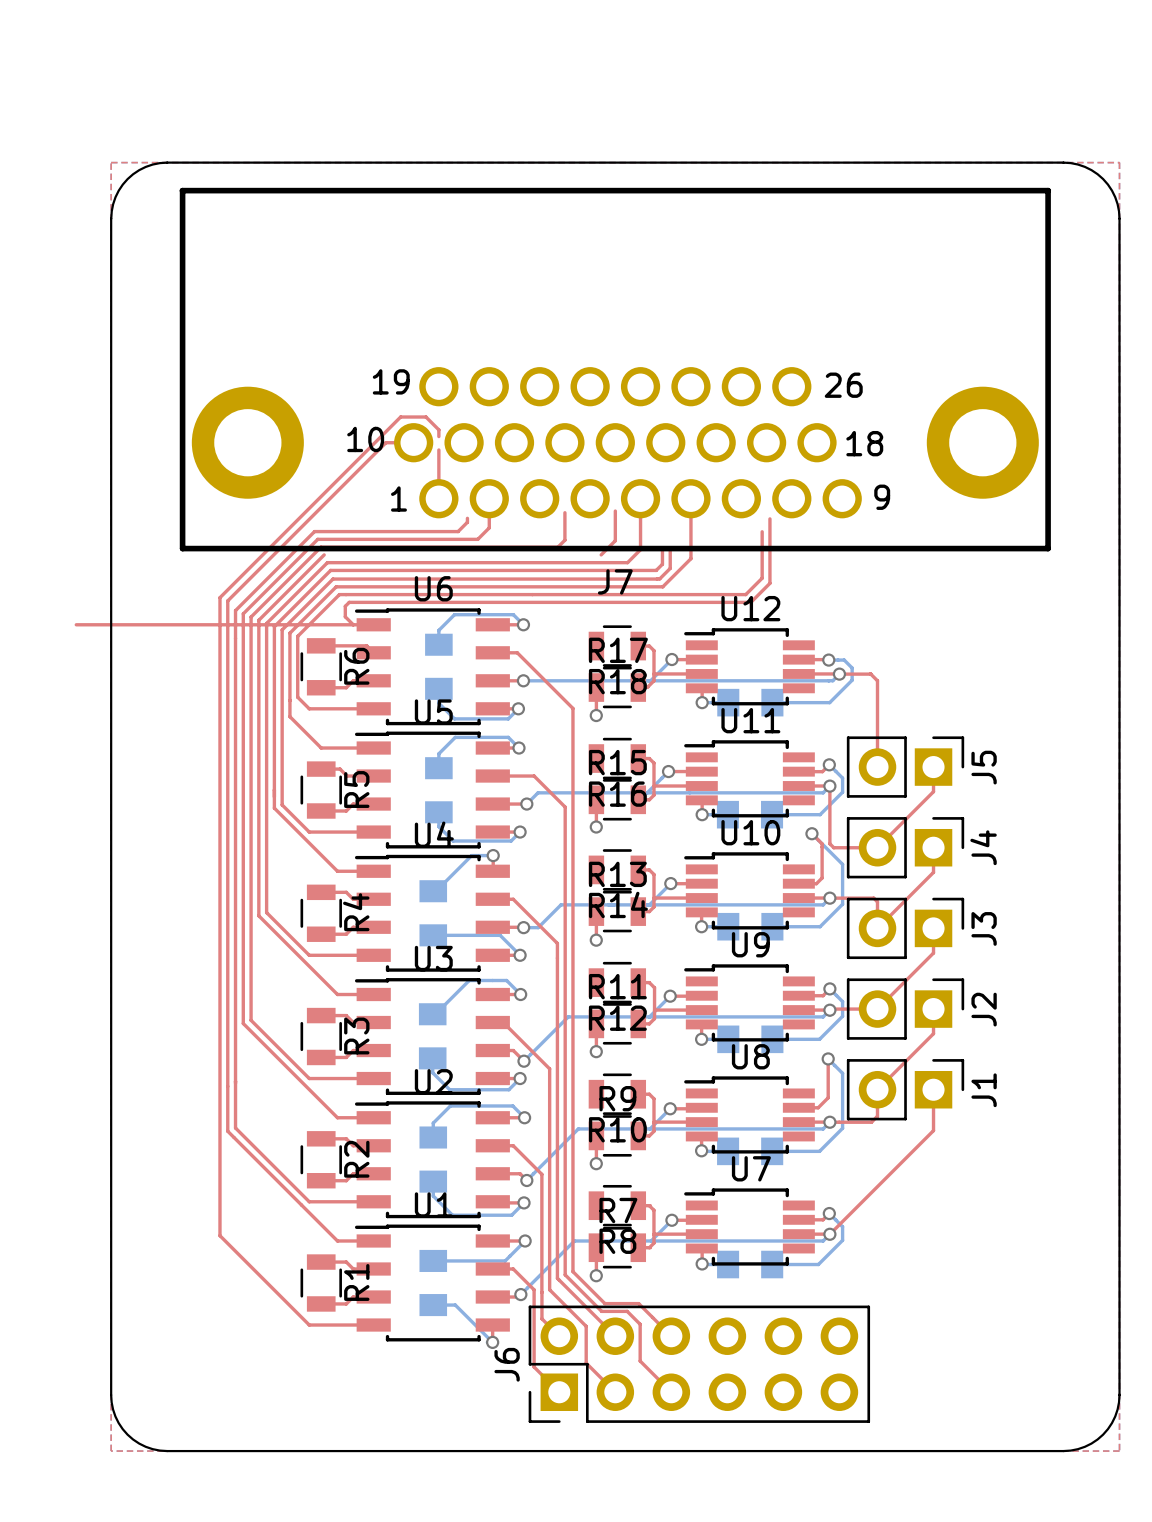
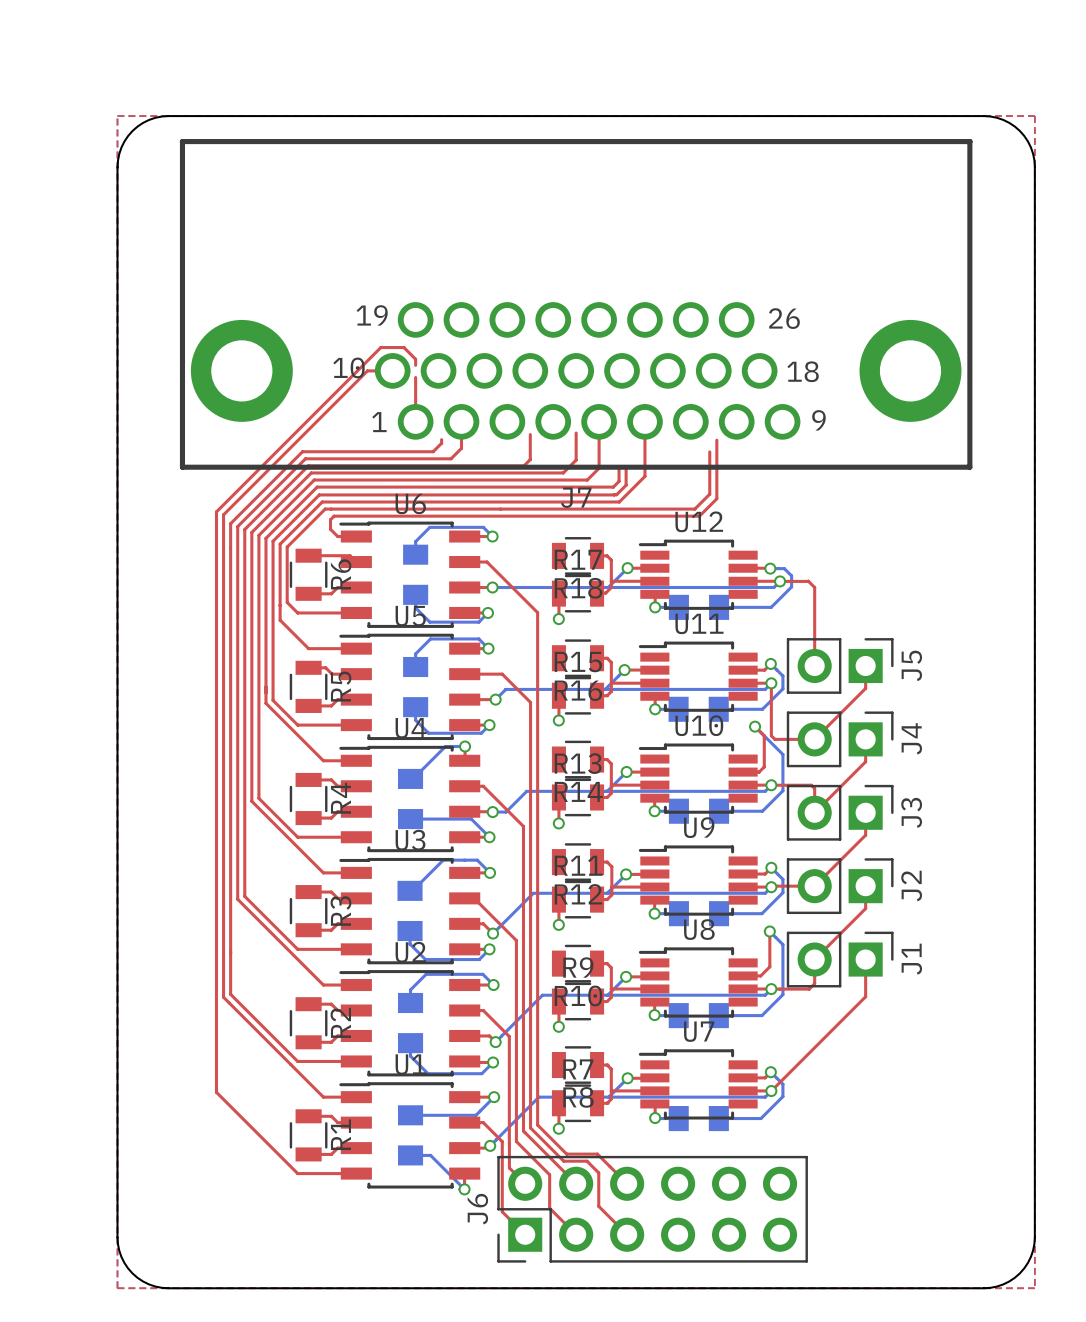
top track: (76, 624) (353, 624) -> (311, 472) (563, 472)

